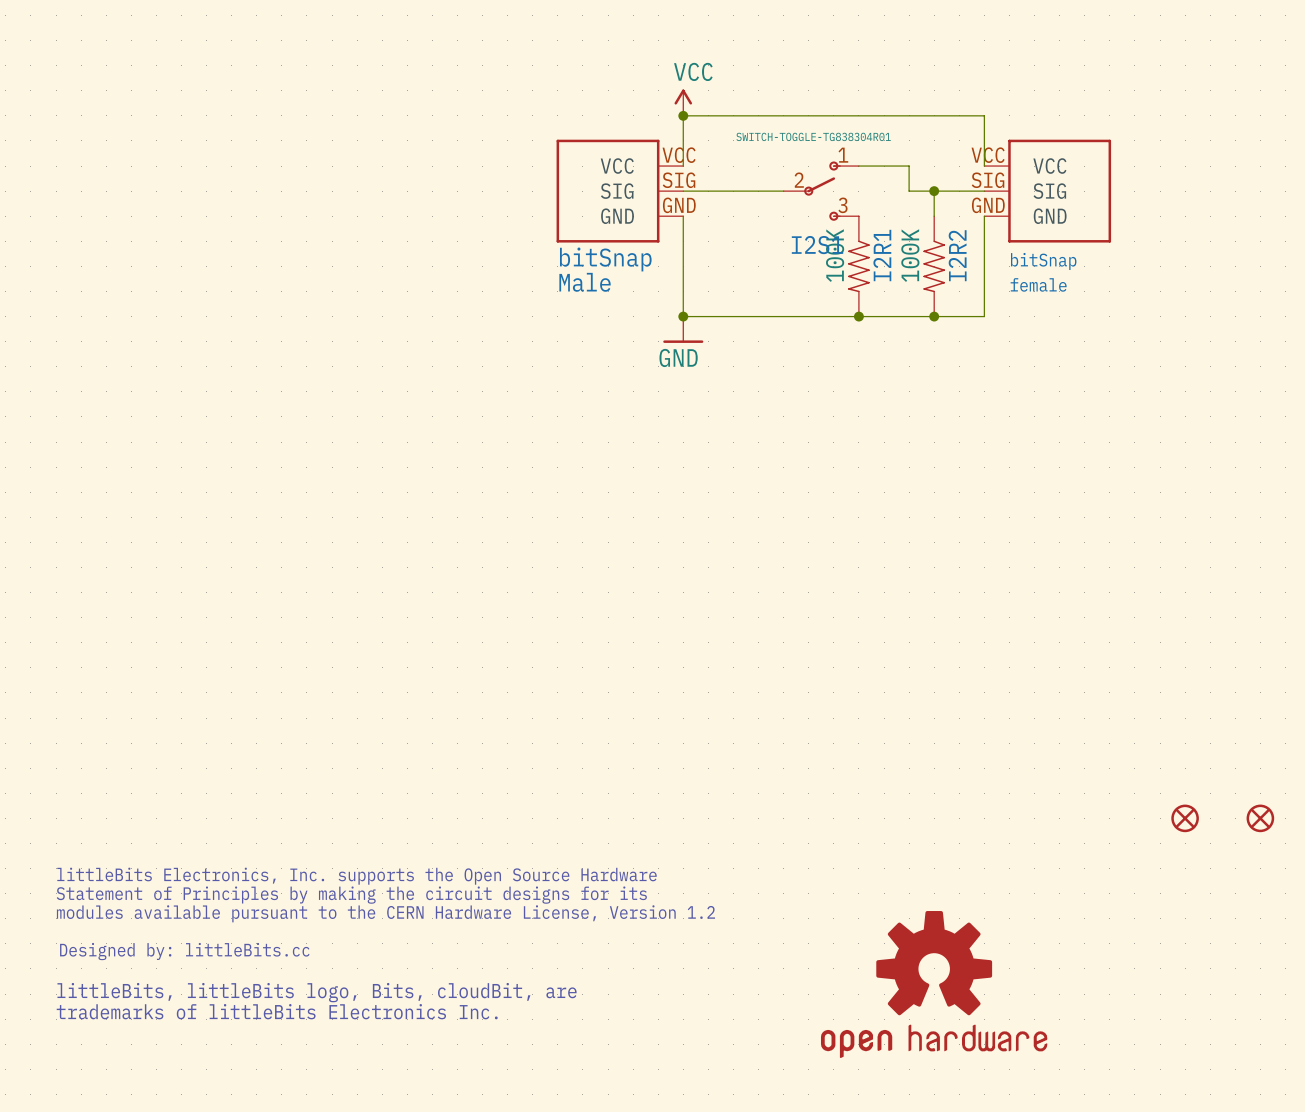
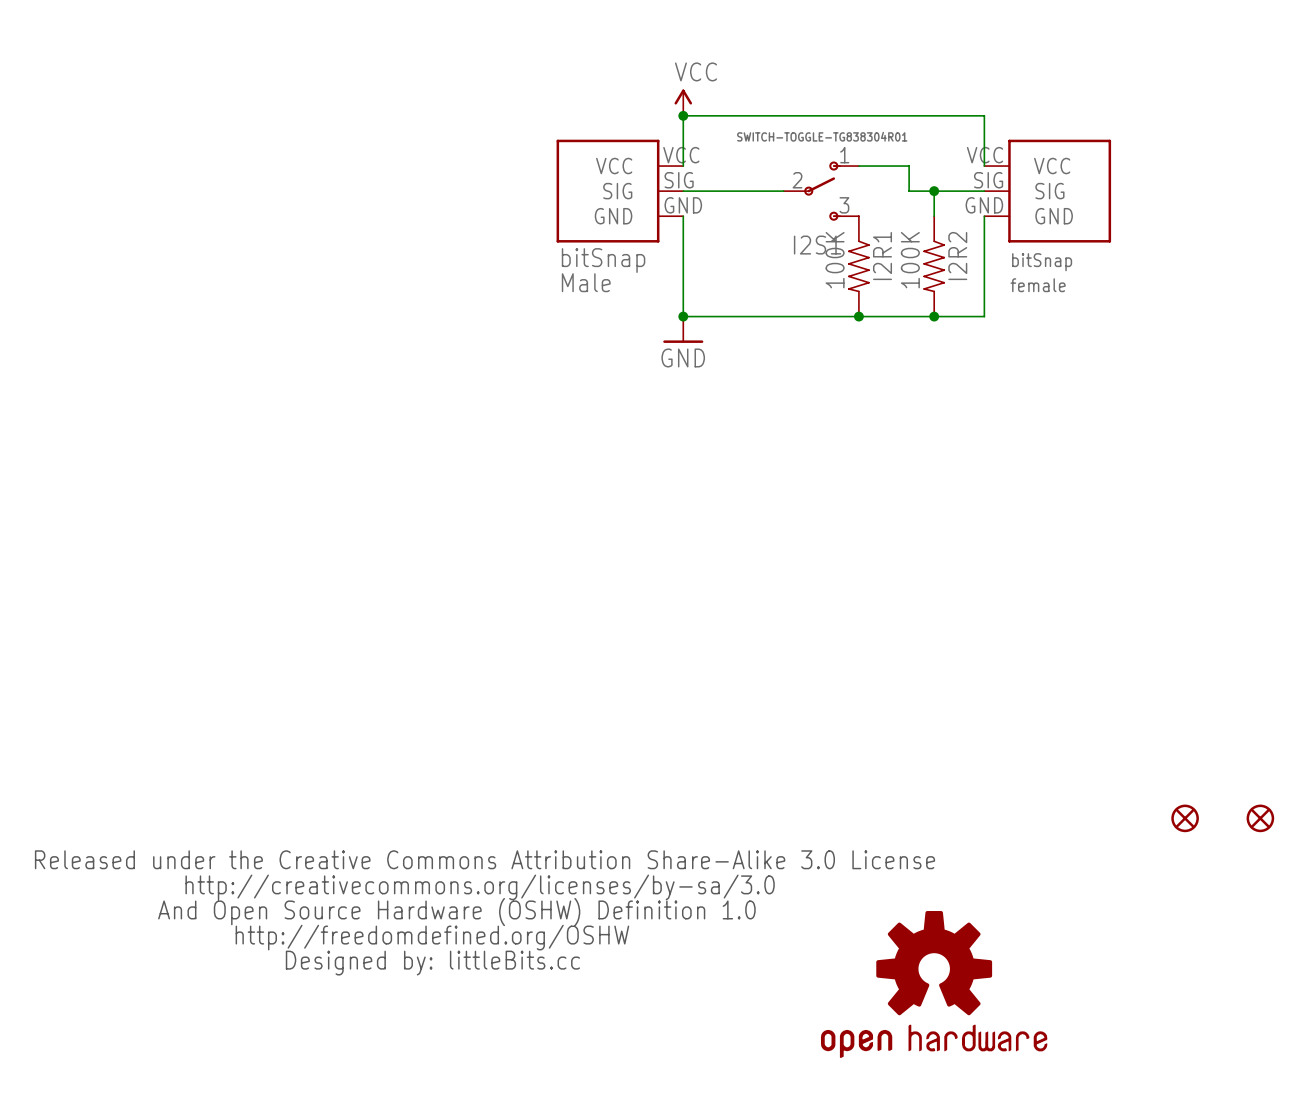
part: none -> (484, 912)
part: (385, 943) -> none

